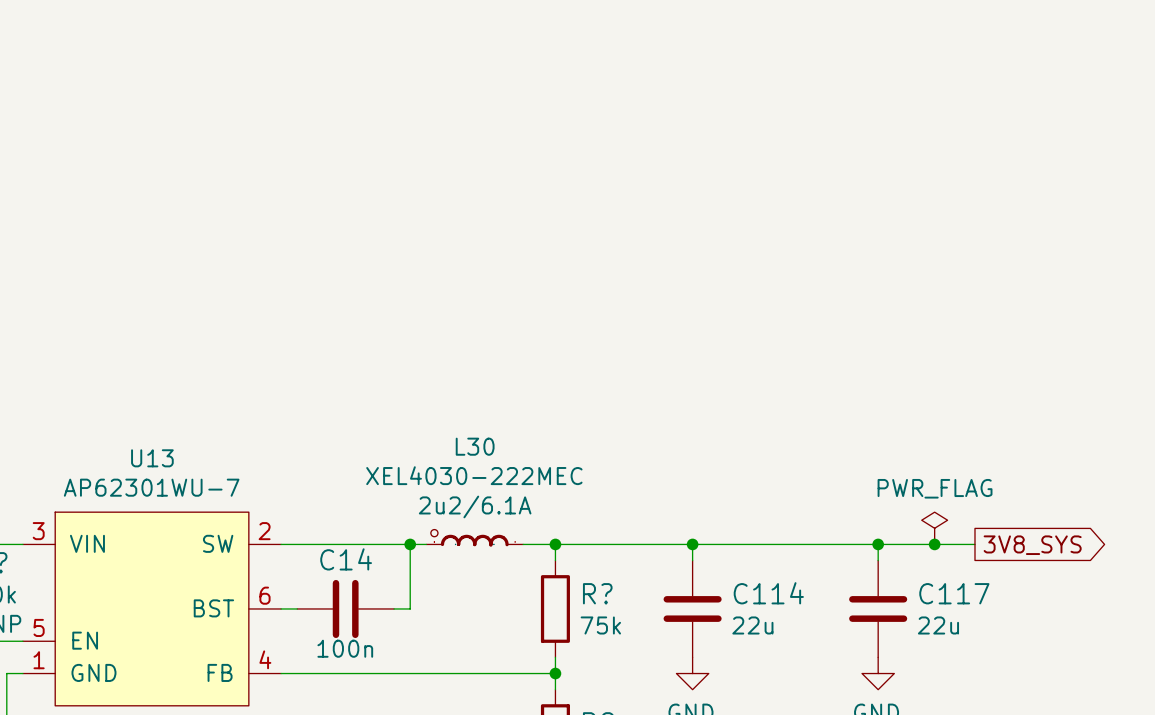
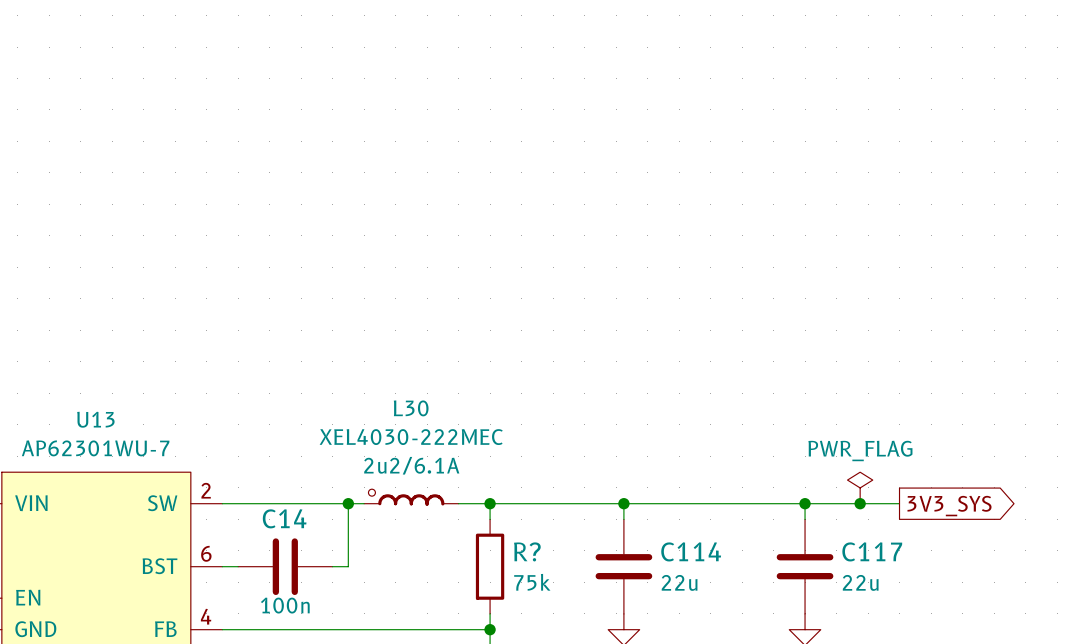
global label: 3V8_SYS (1032, 545) -> 3V3_SYS (949, 506)

